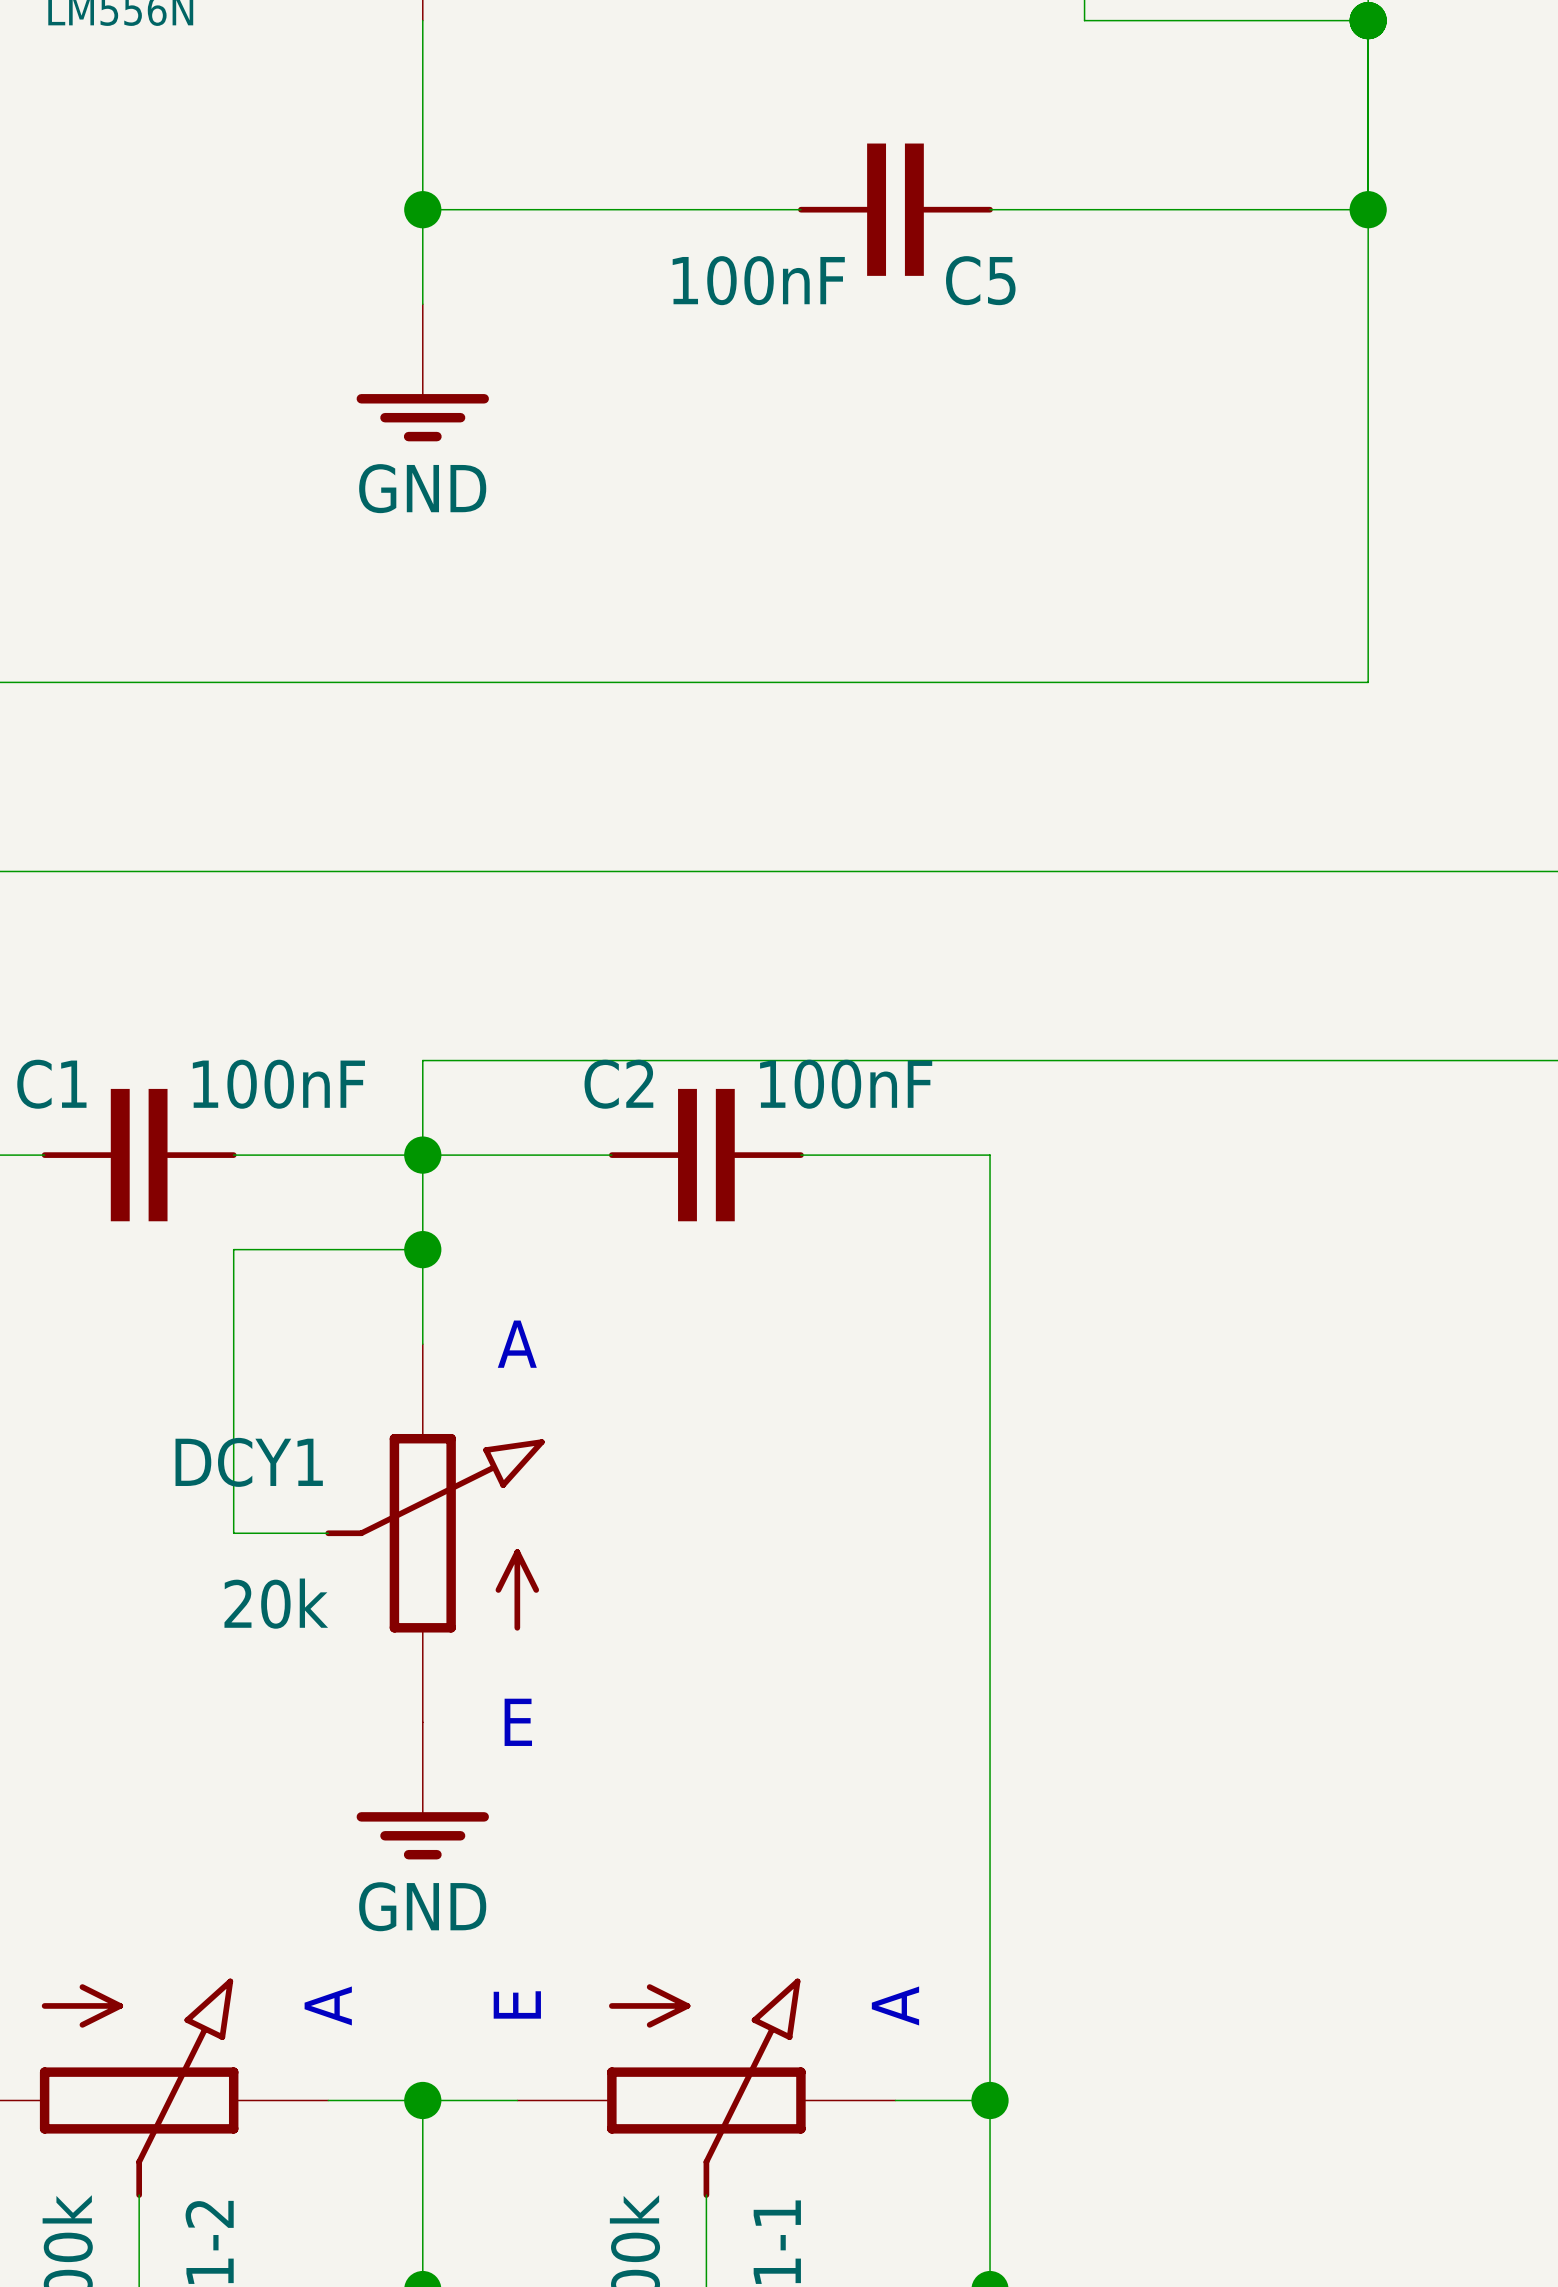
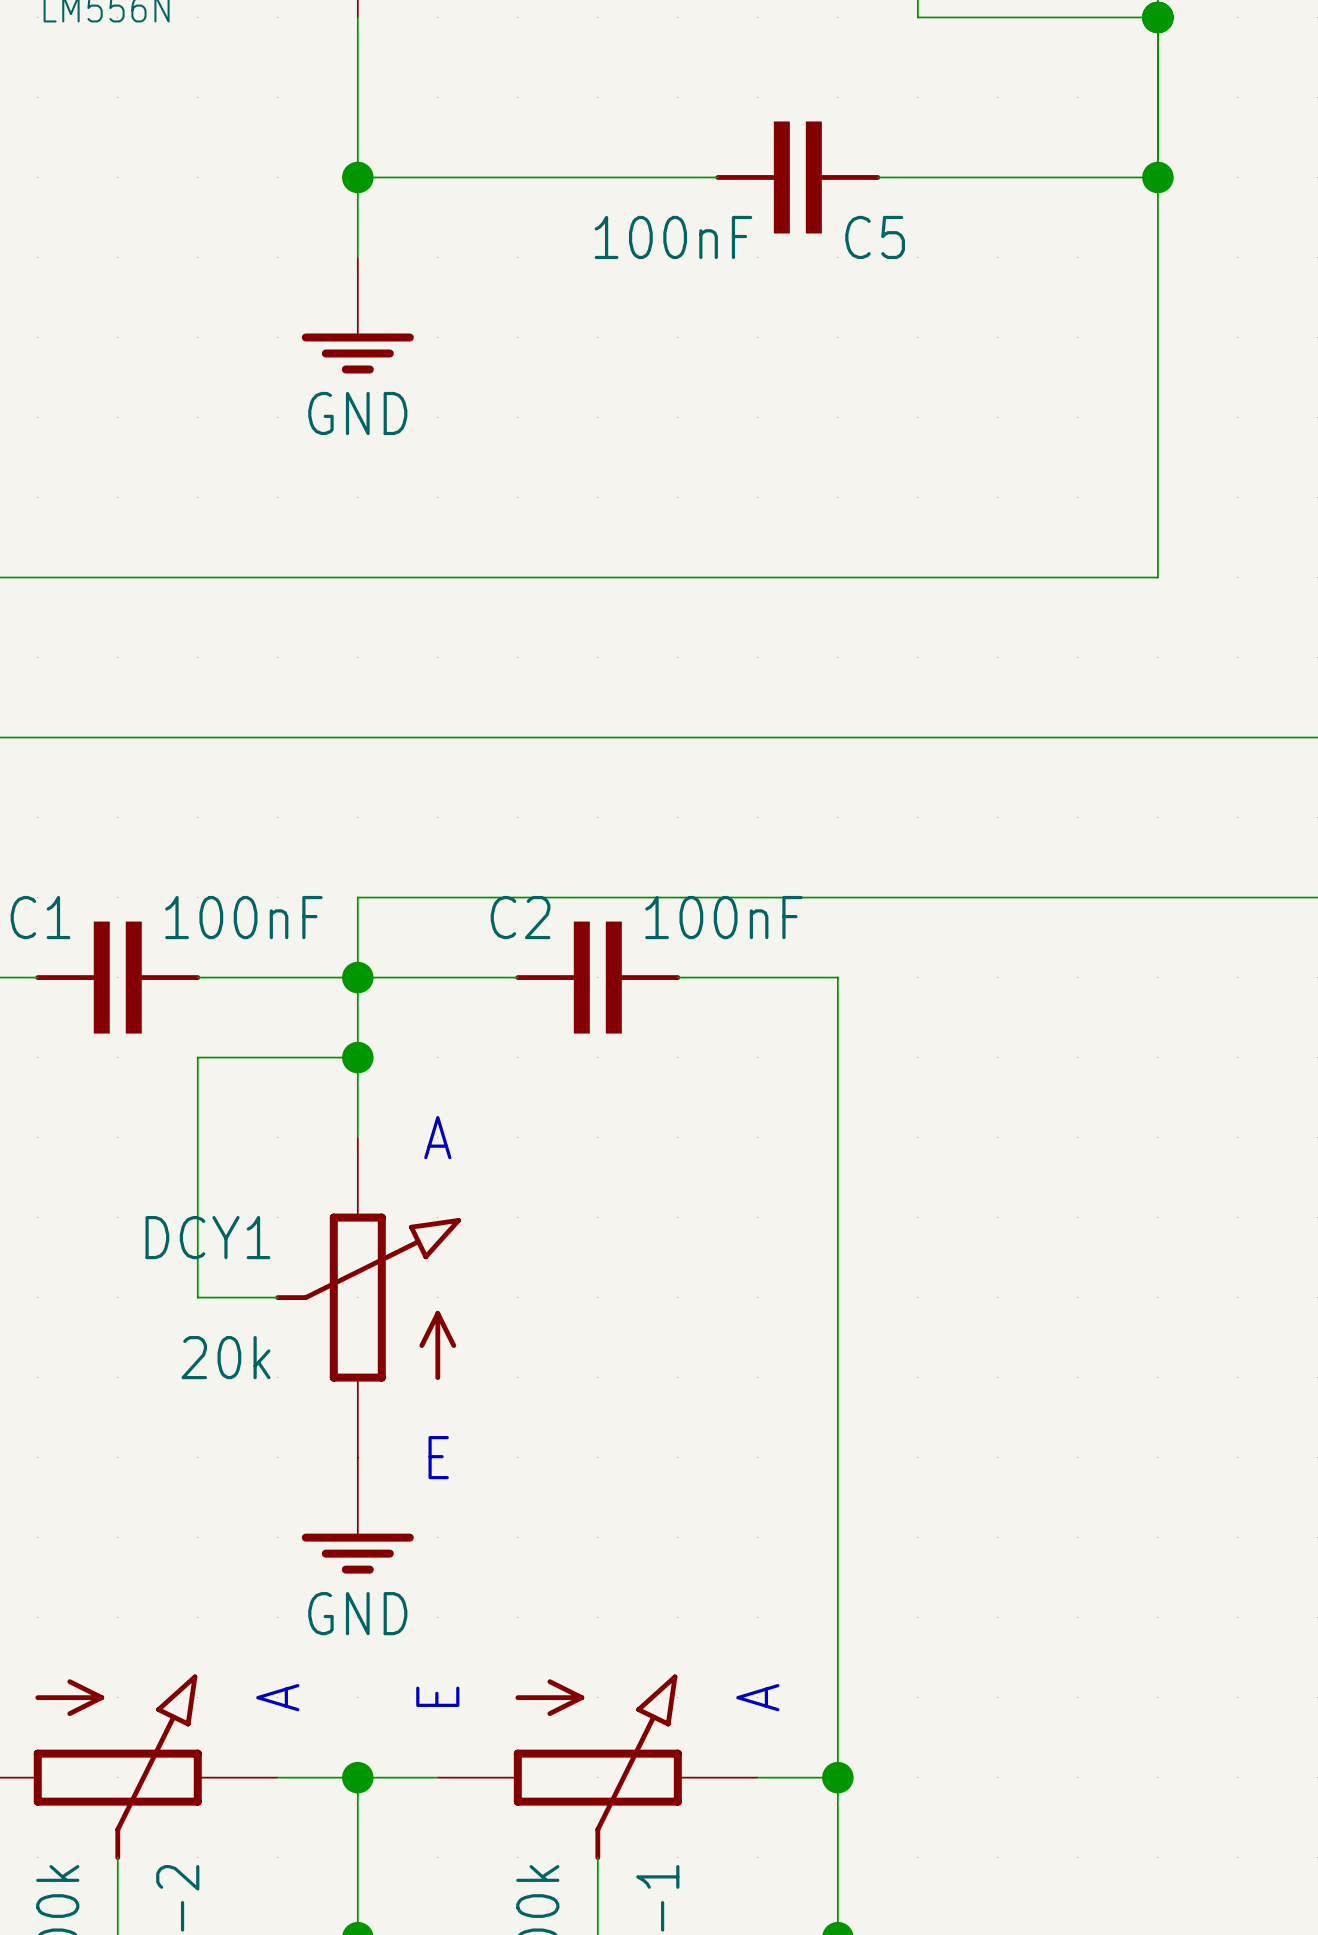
C5 position: (895, 209) -> (797, 177)

